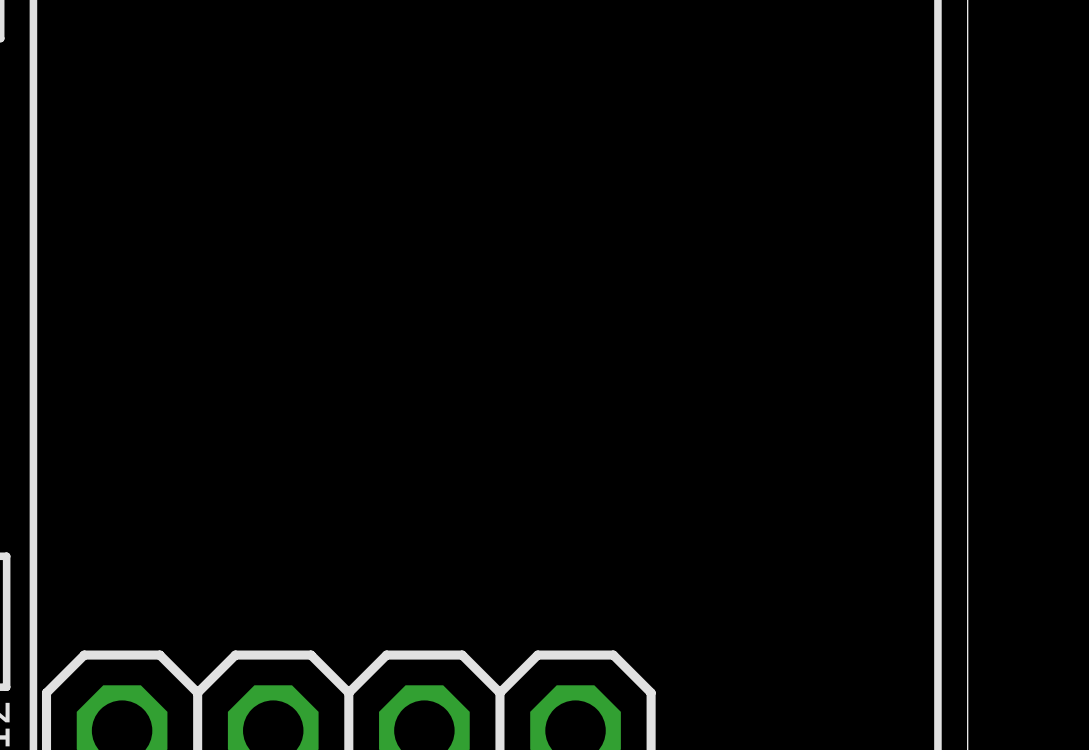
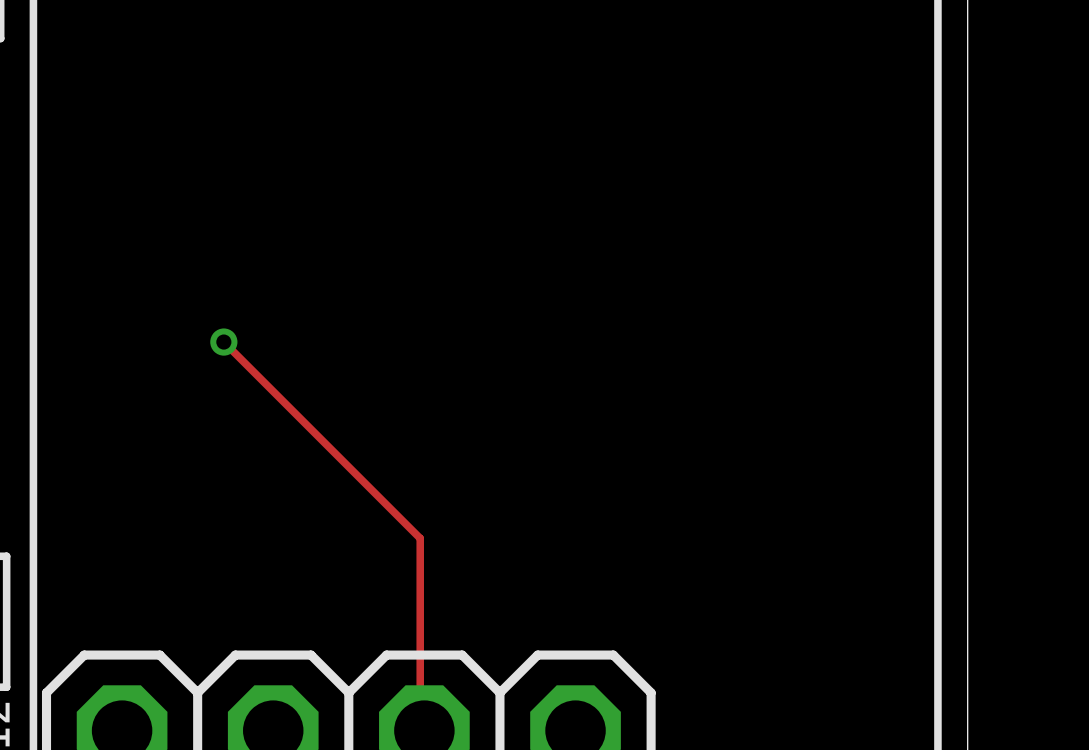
track: none -> (223, 342) (420, 538) (420, 728) (424, 730)
via: none -> (223, 342)

